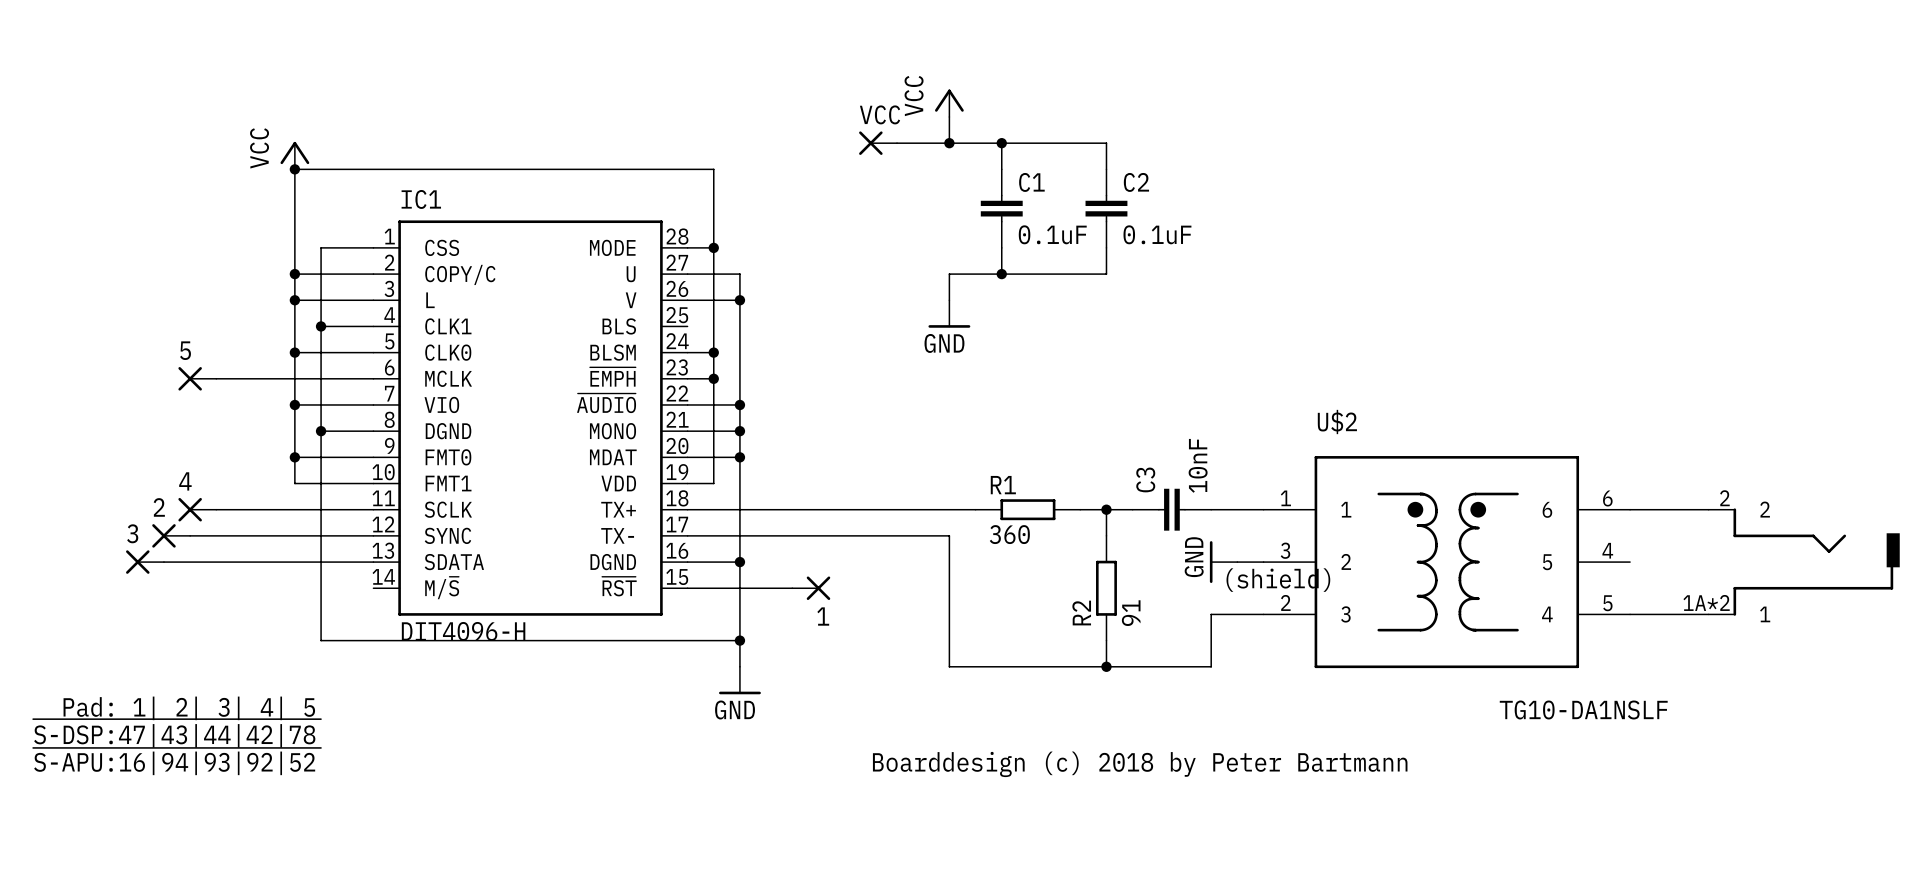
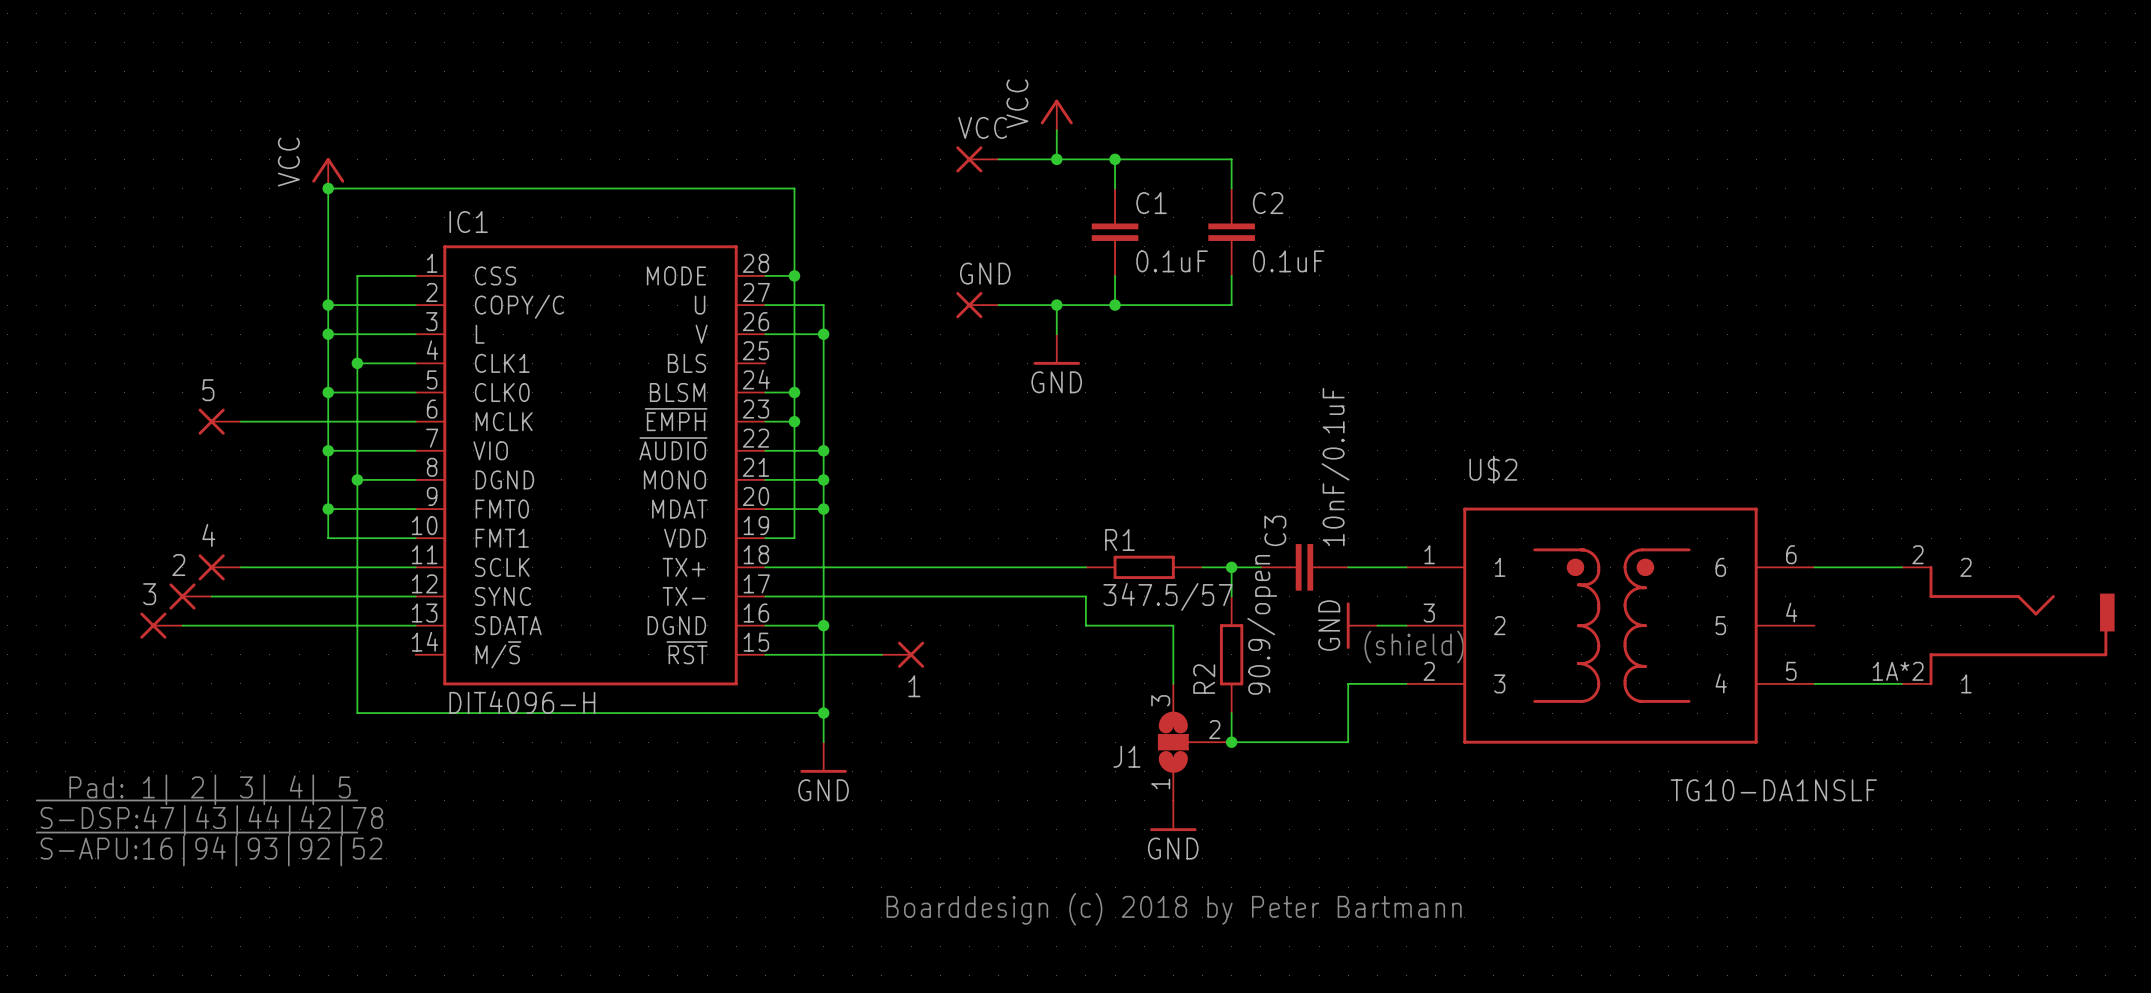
GND: none -> (977, 305)
wire: none -> (998, 305) (1056, 305)
junction: none -> (1056, 305)
C3 value: 10nF (1198, 465) -> 10nF/0.1uF (1335, 467)
R1 value: 360 (1009, 534) -> 347.5/57 (1168, 596)
wire: (949, 535) (949, 666) (1106, 666) -> (1056, 596) (1085, 596) (1085, 625) (1173, 625) (1173, 683)
R2 value: 91 (1131, 613) -> 90.9/open (1262, 624)
J1: none -> (1194, 742)
power symbol: none -> GND (1173, 815)
text position: Boarddesign (c) 2018 by Peter Bartmann (1140, 764) -> Boarddesign (c) 2018 by Peter Bartmann (1174, 909)

